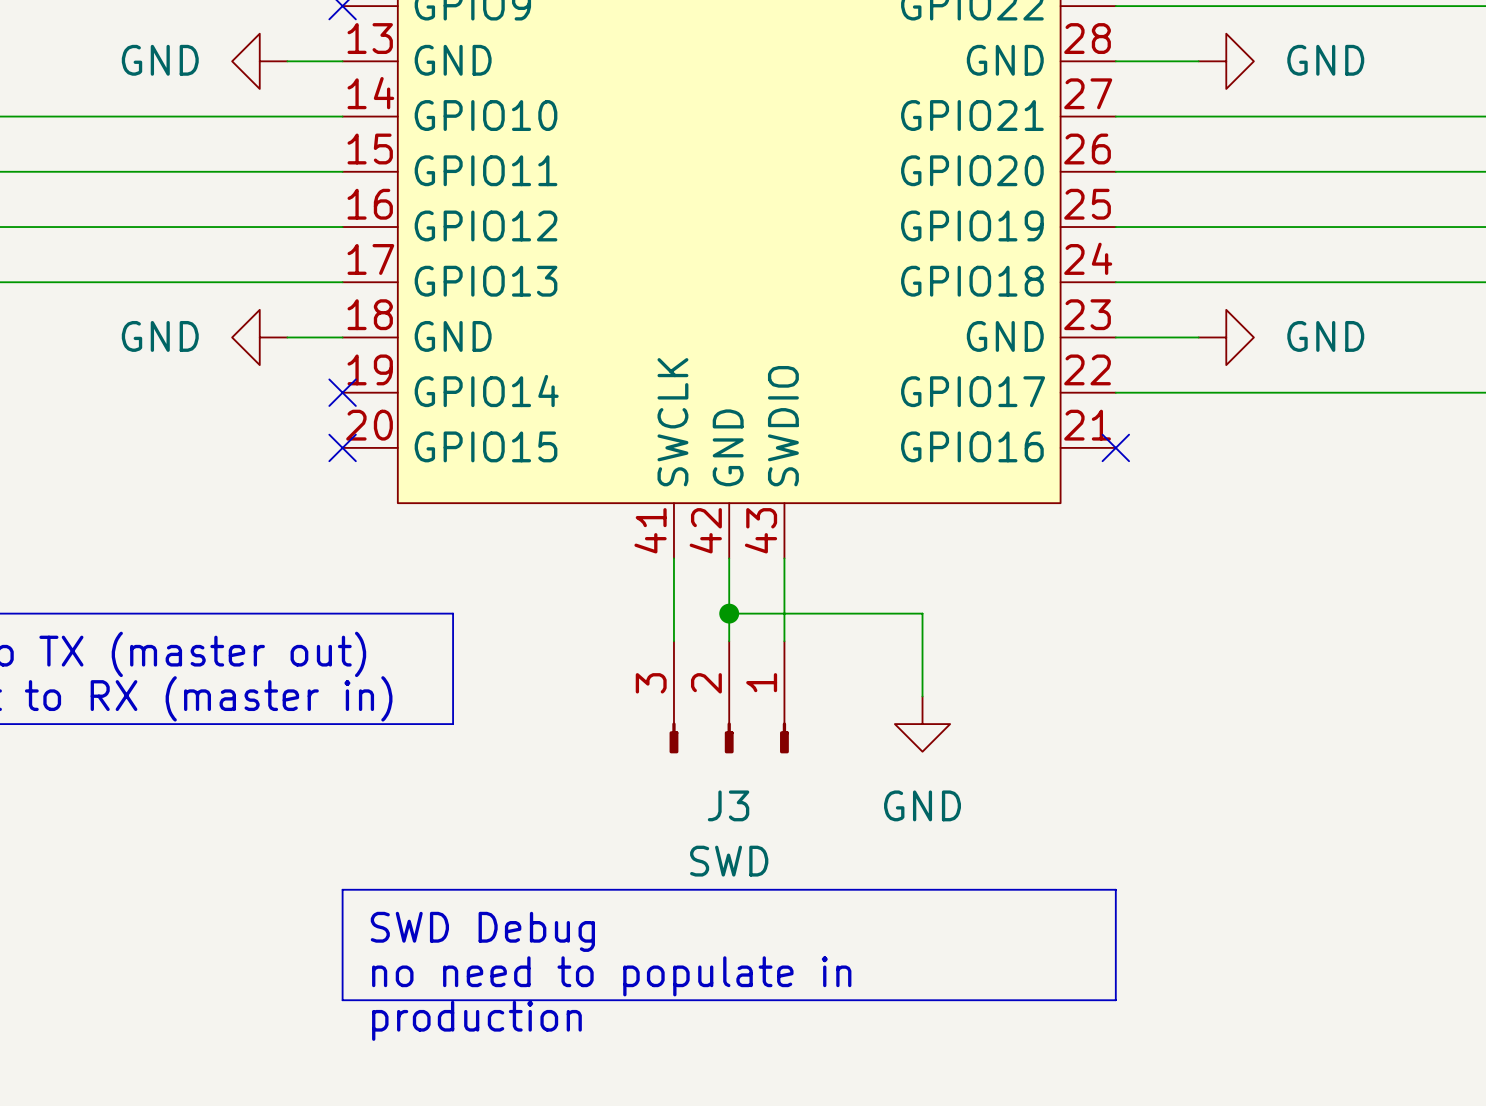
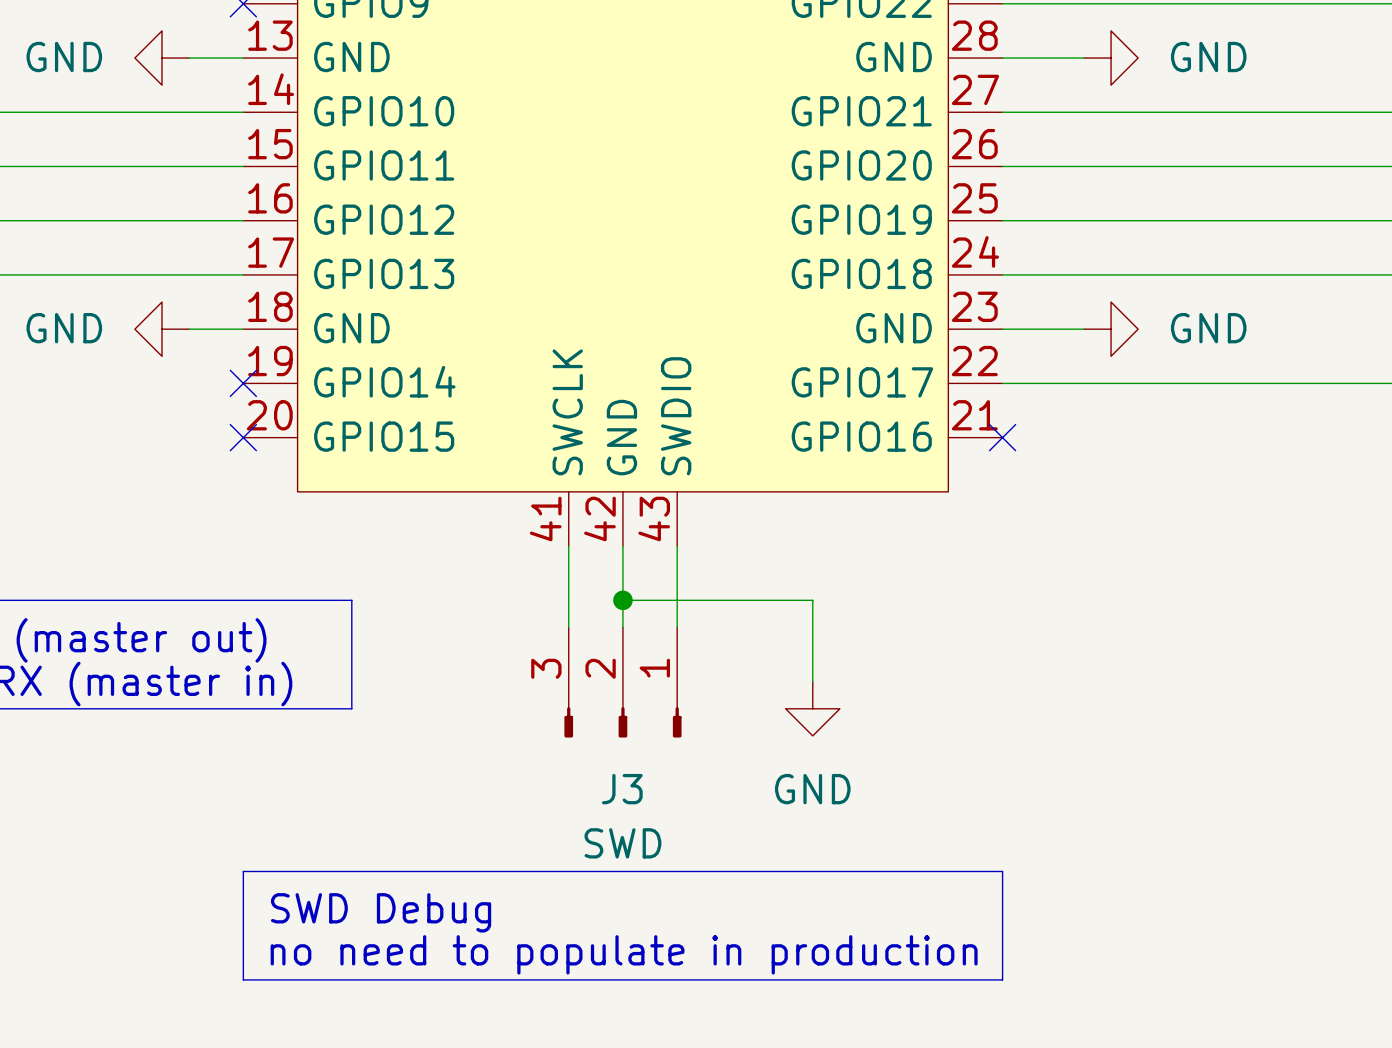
text: no need to populate in (611, 976) -> no need to populate in production (624, 954)
text: production (476, 1020) -> none

